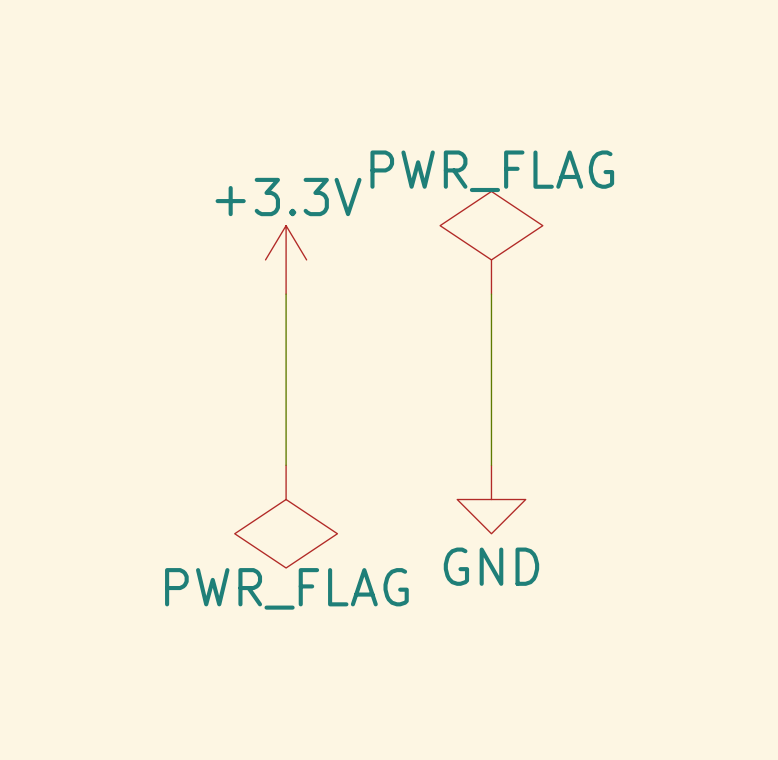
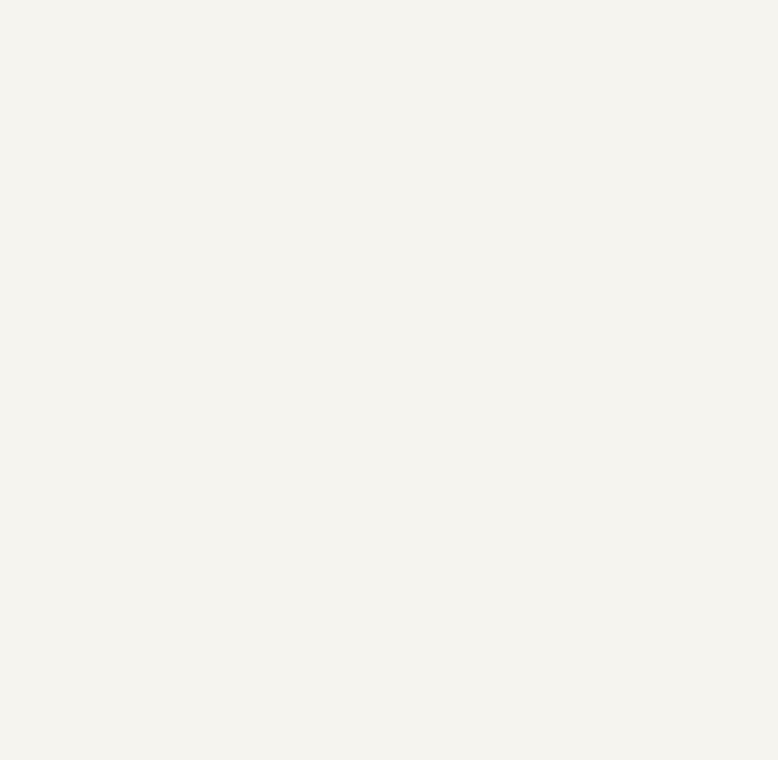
power symbol: PWR_FLAG (491, 242) -> none
power symbol: +3.3V (286, 259) -> none
wire: (286, 294) (286, 465) -> none
wire: (491, 294) (491, 465) -> none
power symbol: GND (491, 499) -> none
power symbol: PWR_FLAG (286, 516) -> none

